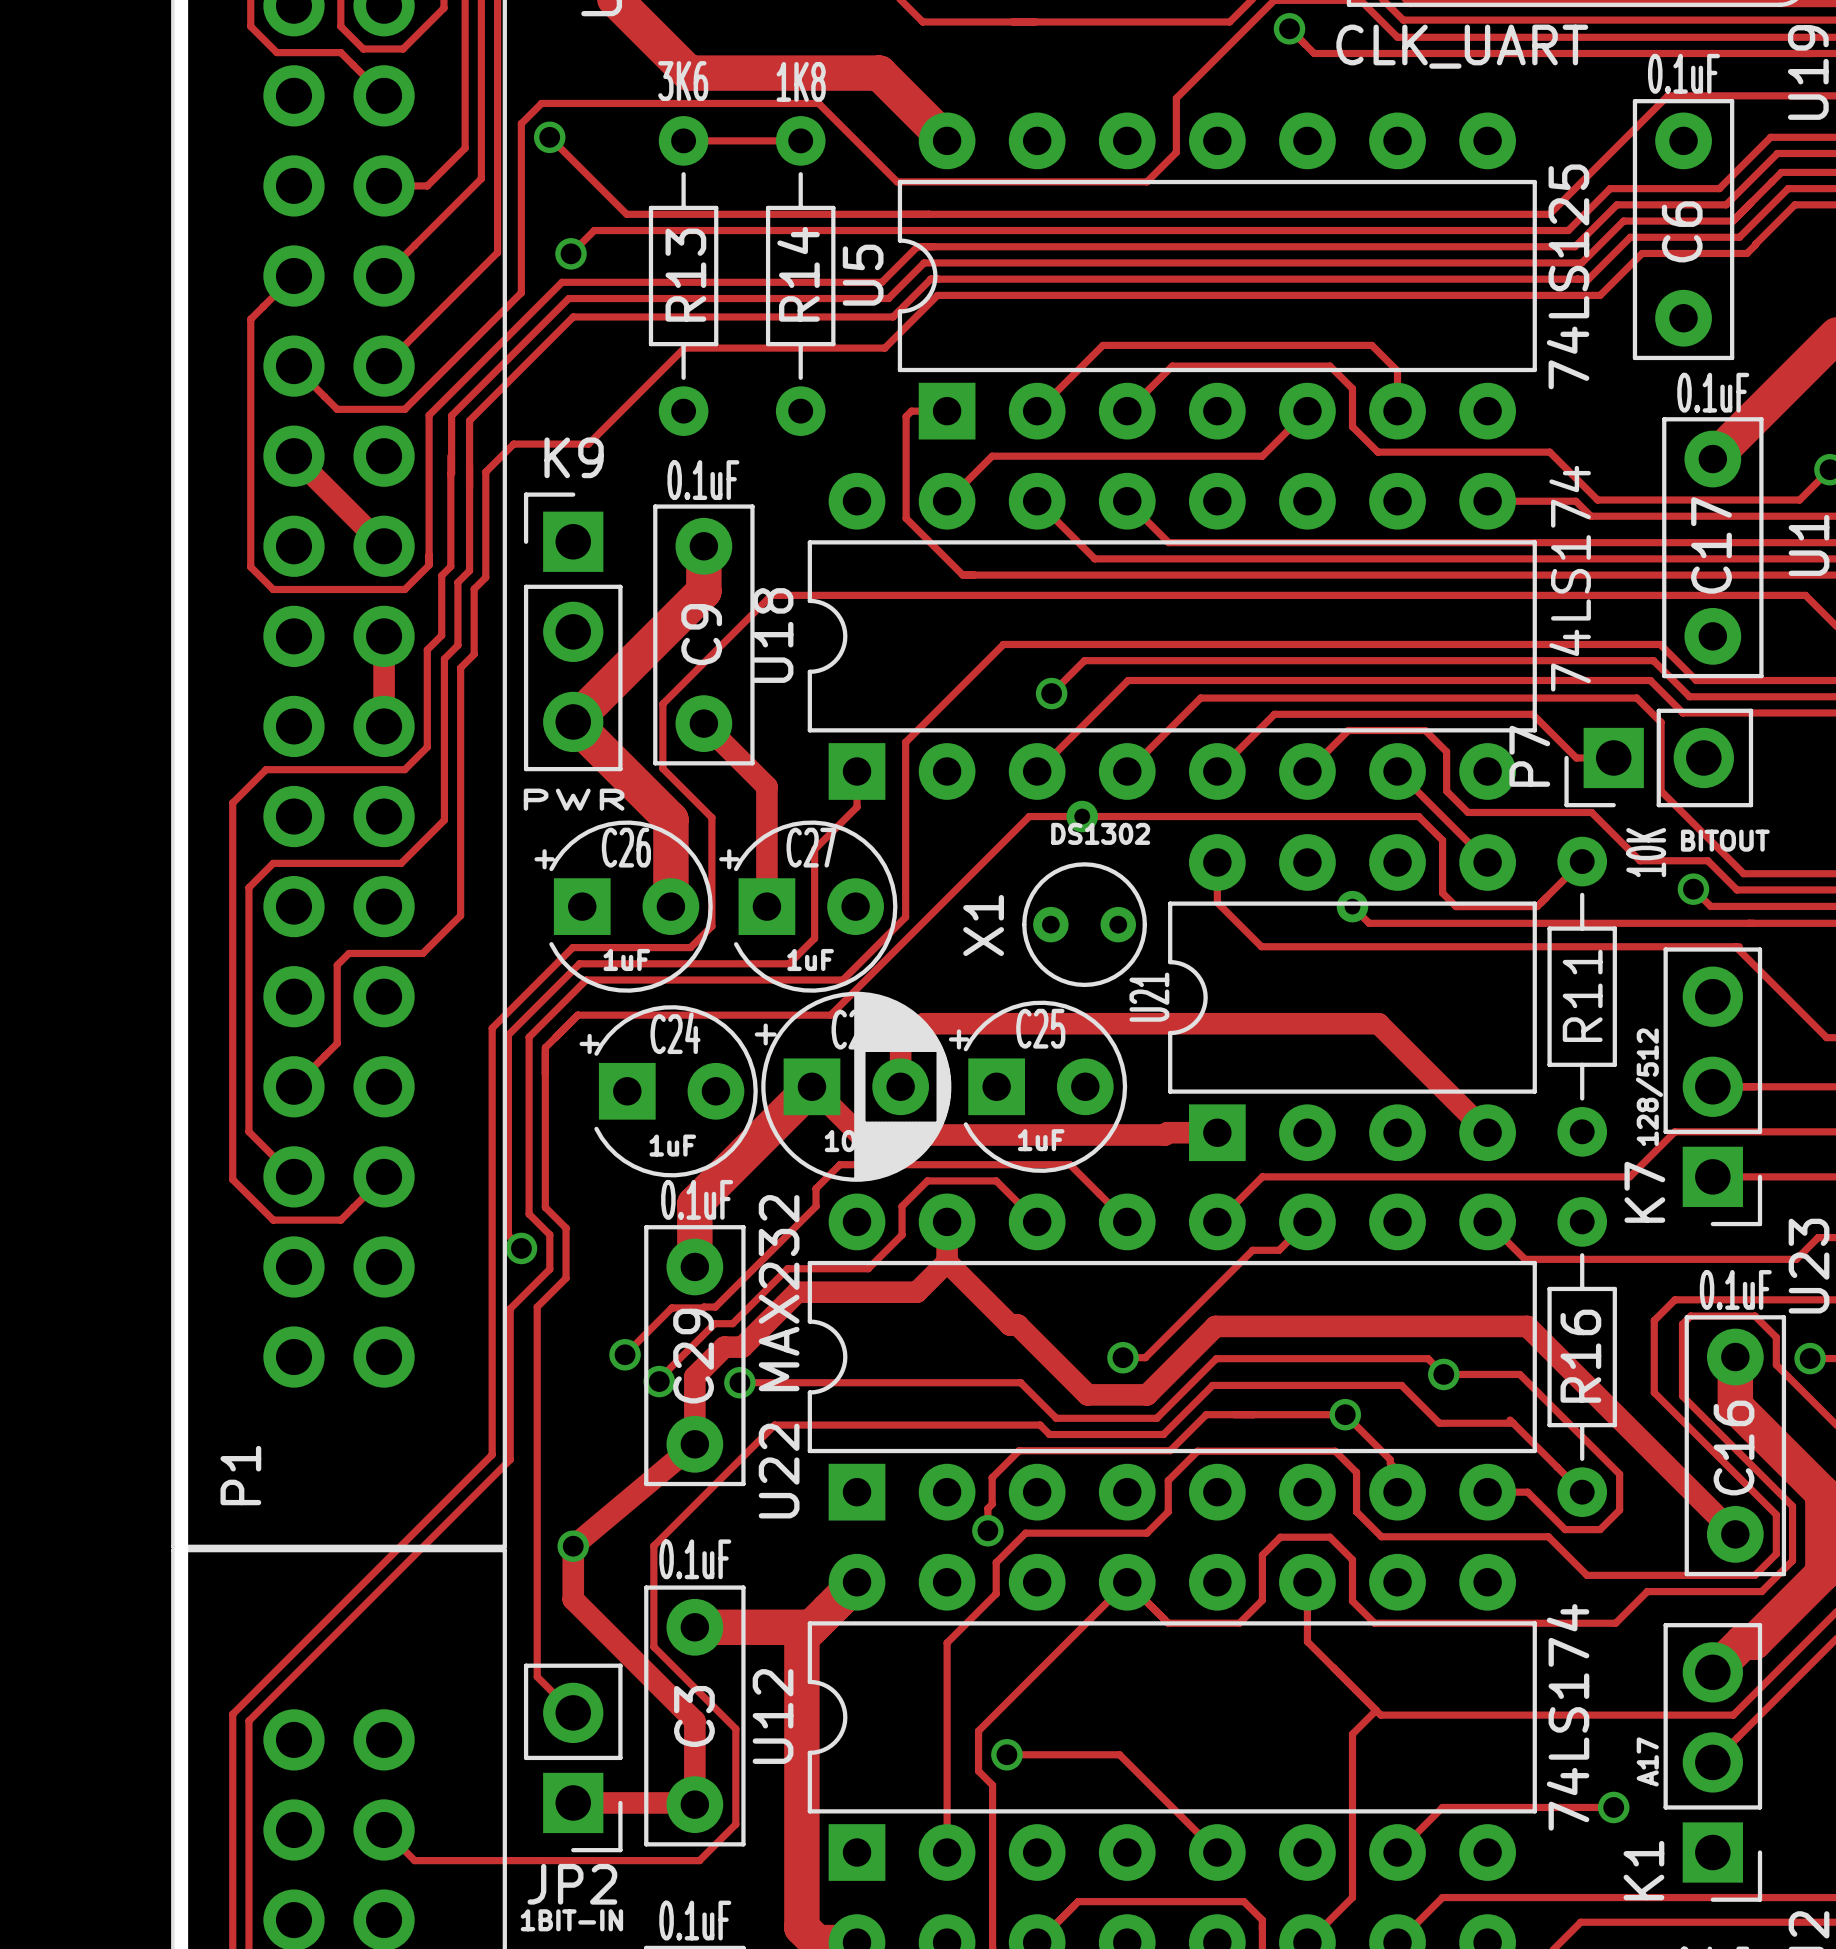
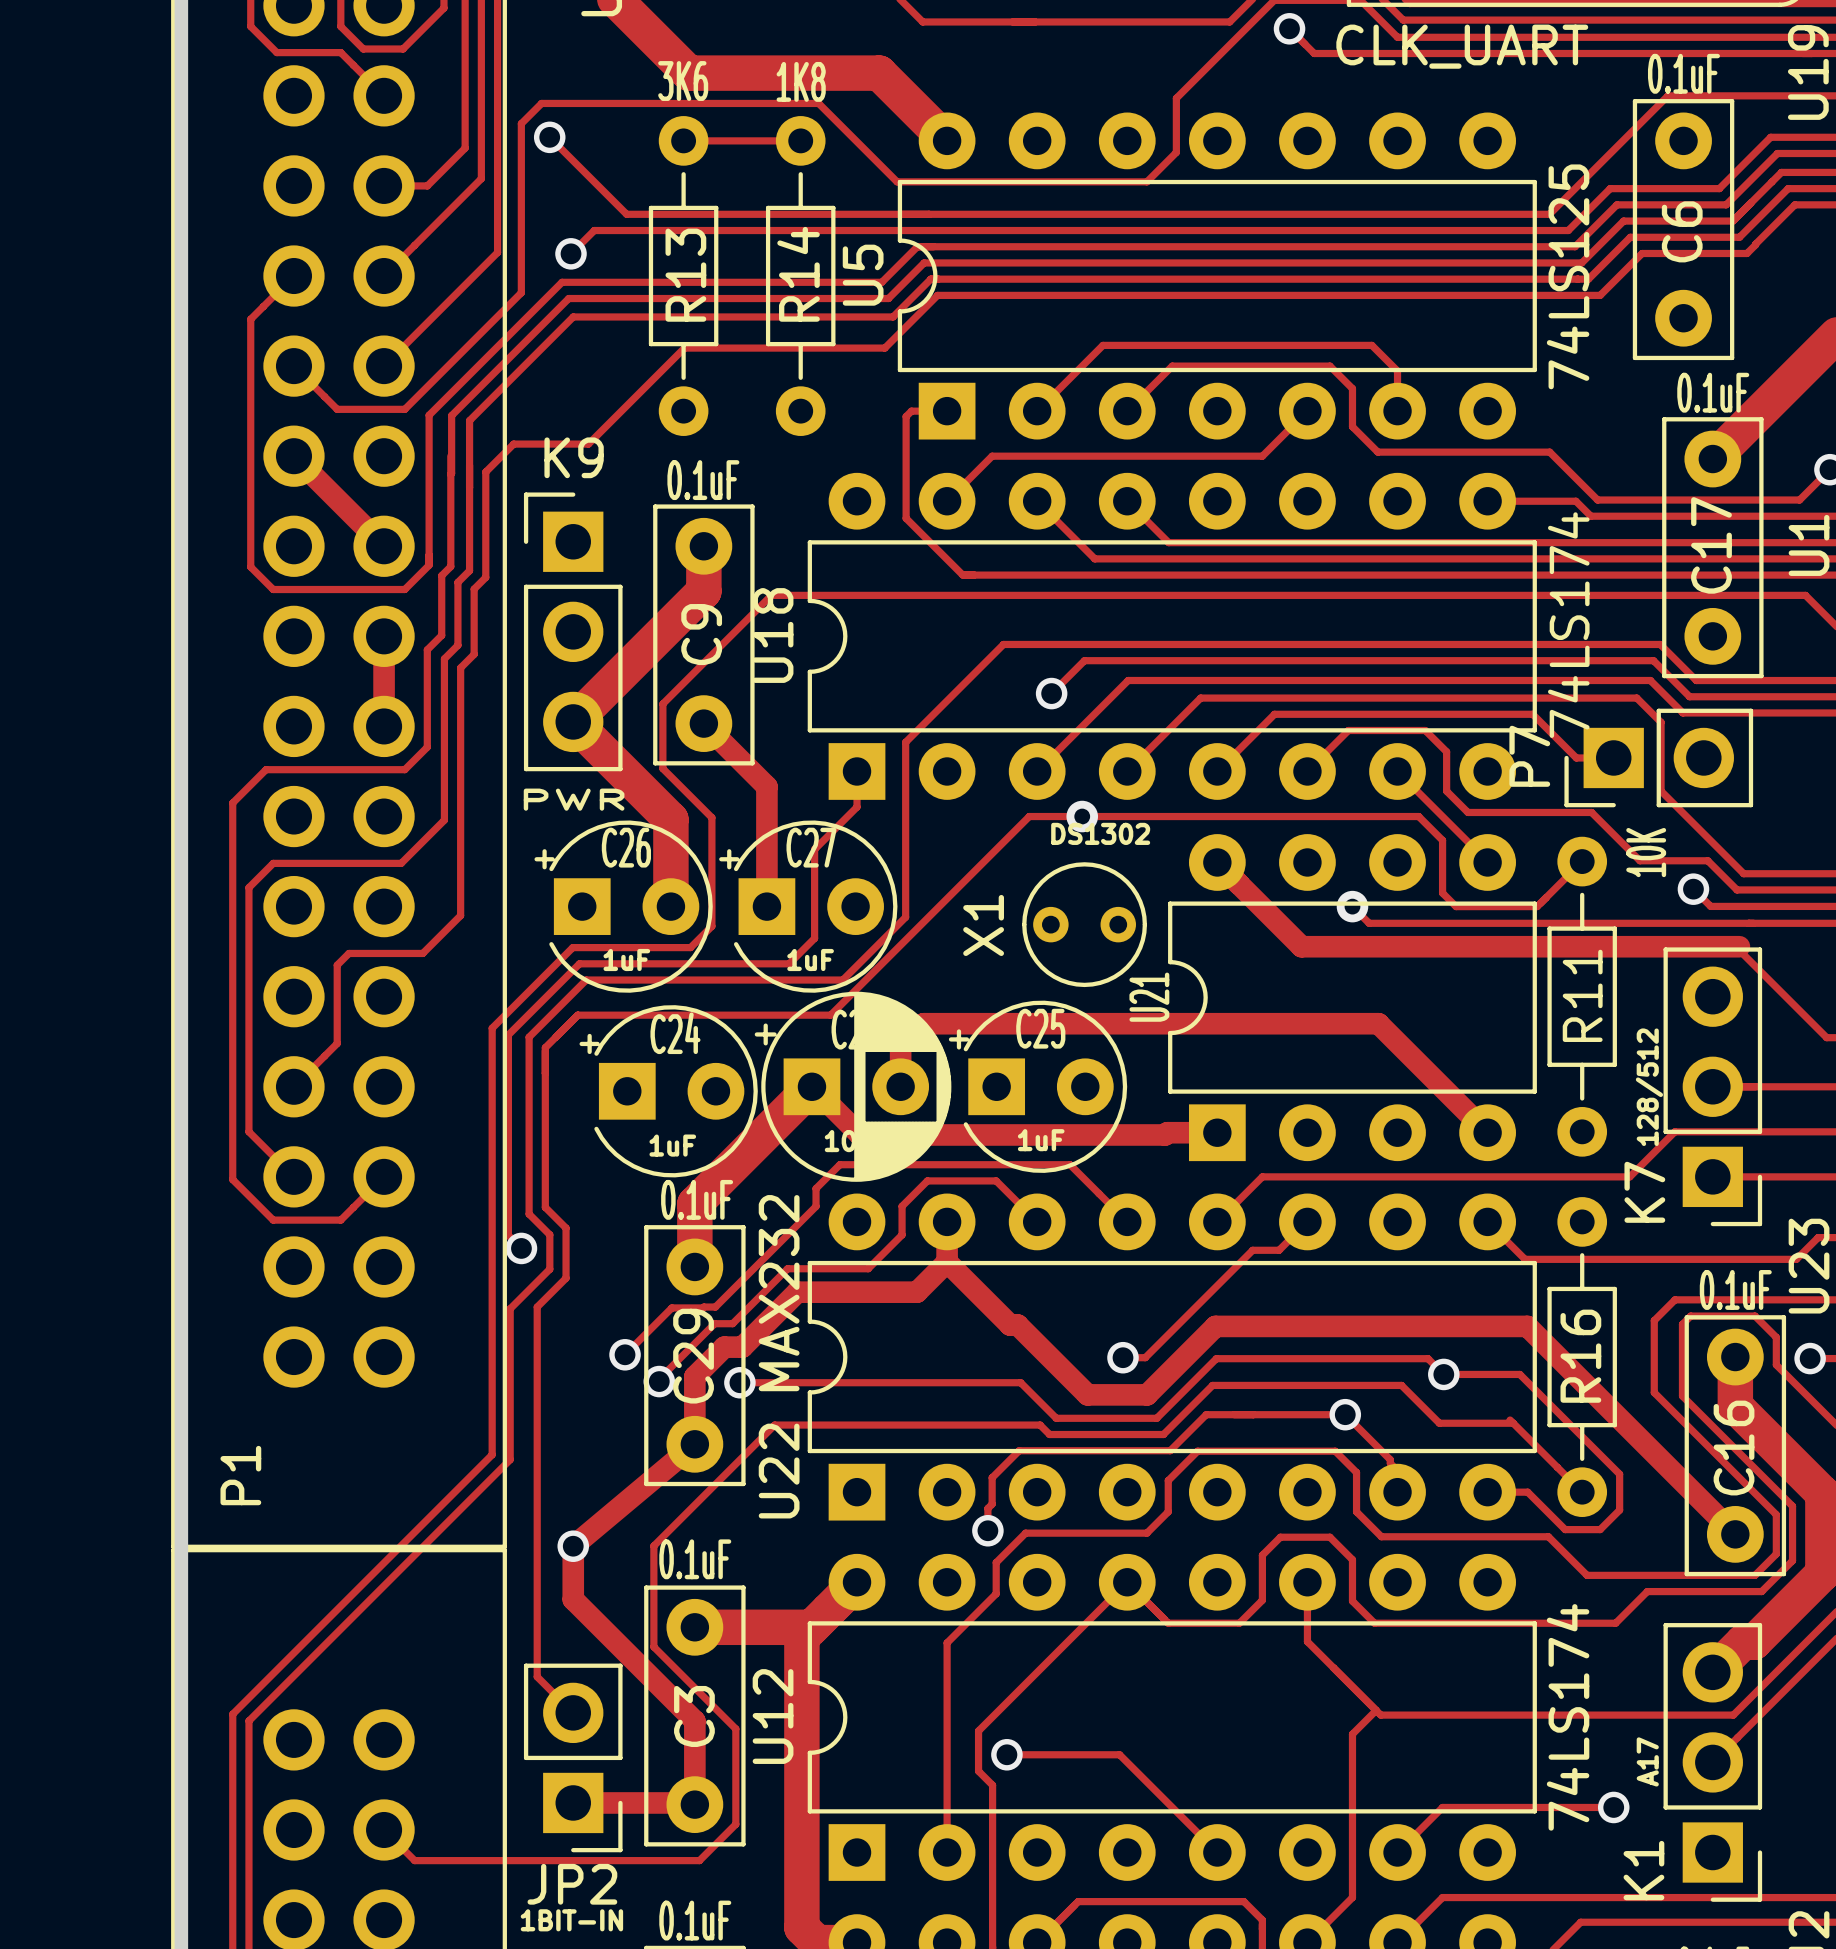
U18 value position: 74LS174 (1570, 578) -> 74LS174 (1568, 625)
P7 value: BITOUT (1725, 840) -> none
track: (1217, 862) (1217, 902) (1261, 946) (1301, 946) -> (1210, 855) (1301, 946)
track width: thin (1301, 946) (1739, 946) -> thick (1301, 946) (1739, 946)

